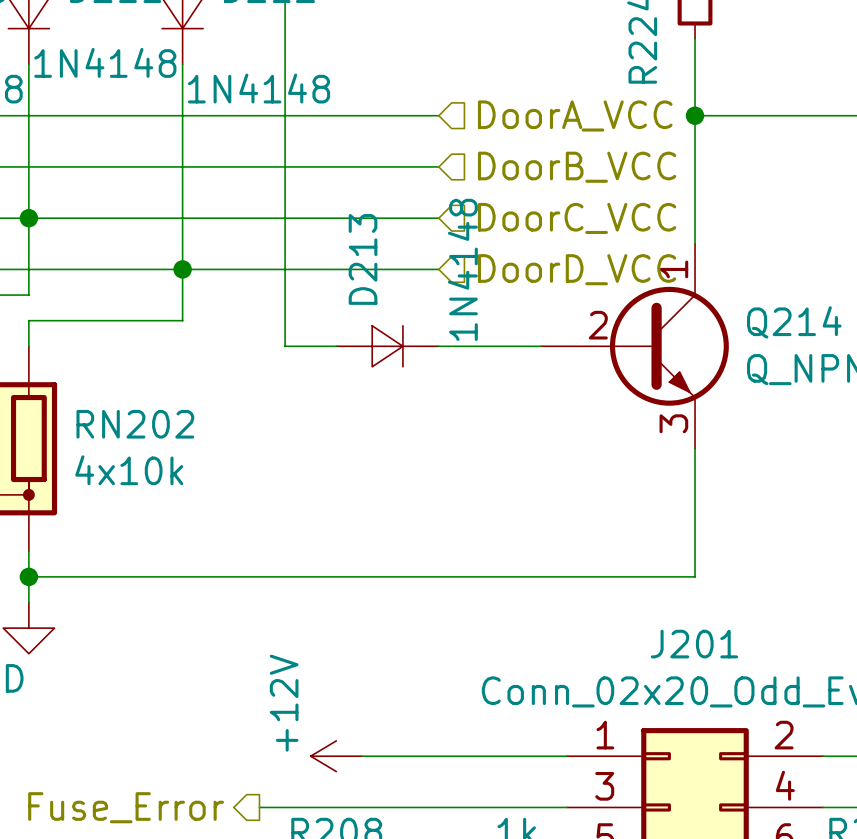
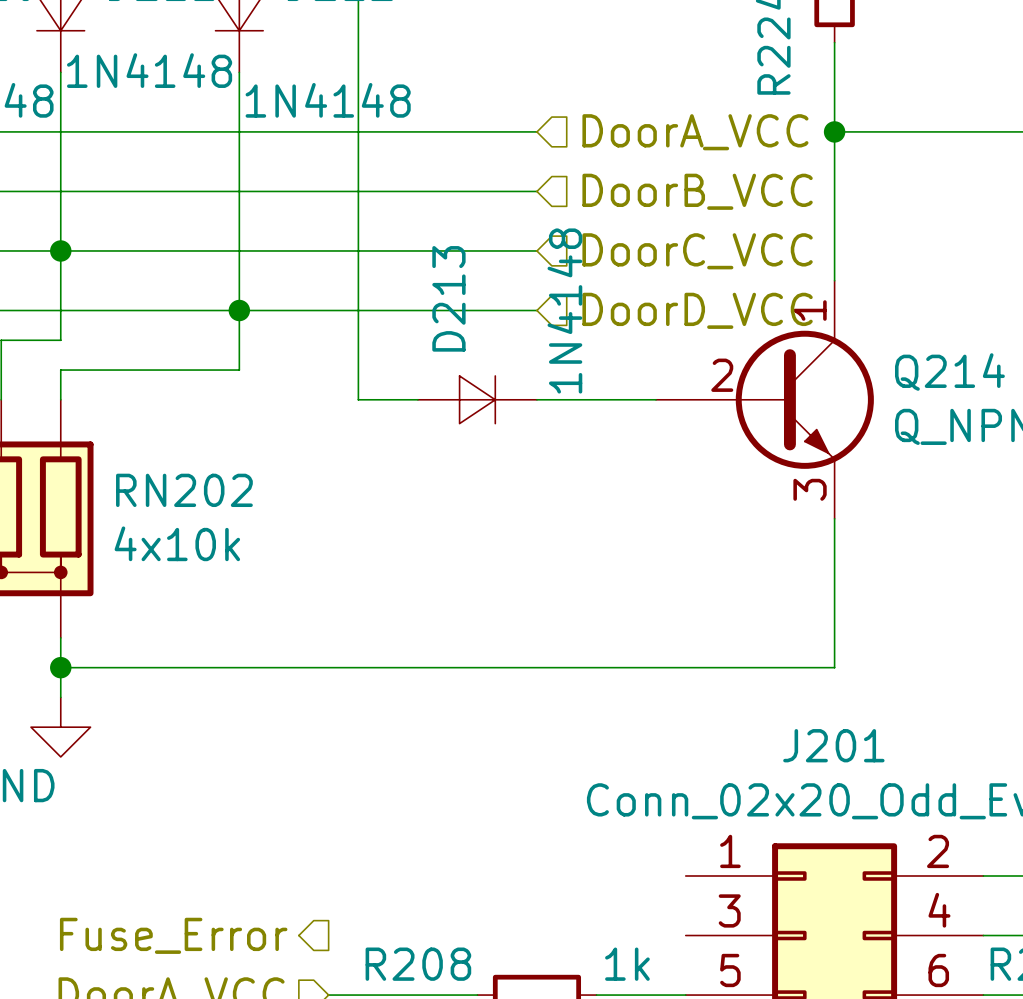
power symbol: +12V (336, 756) -> none
wire: (361, 756) (566, 756) -> none
wire: (259, 807) (566, 807) -> none

